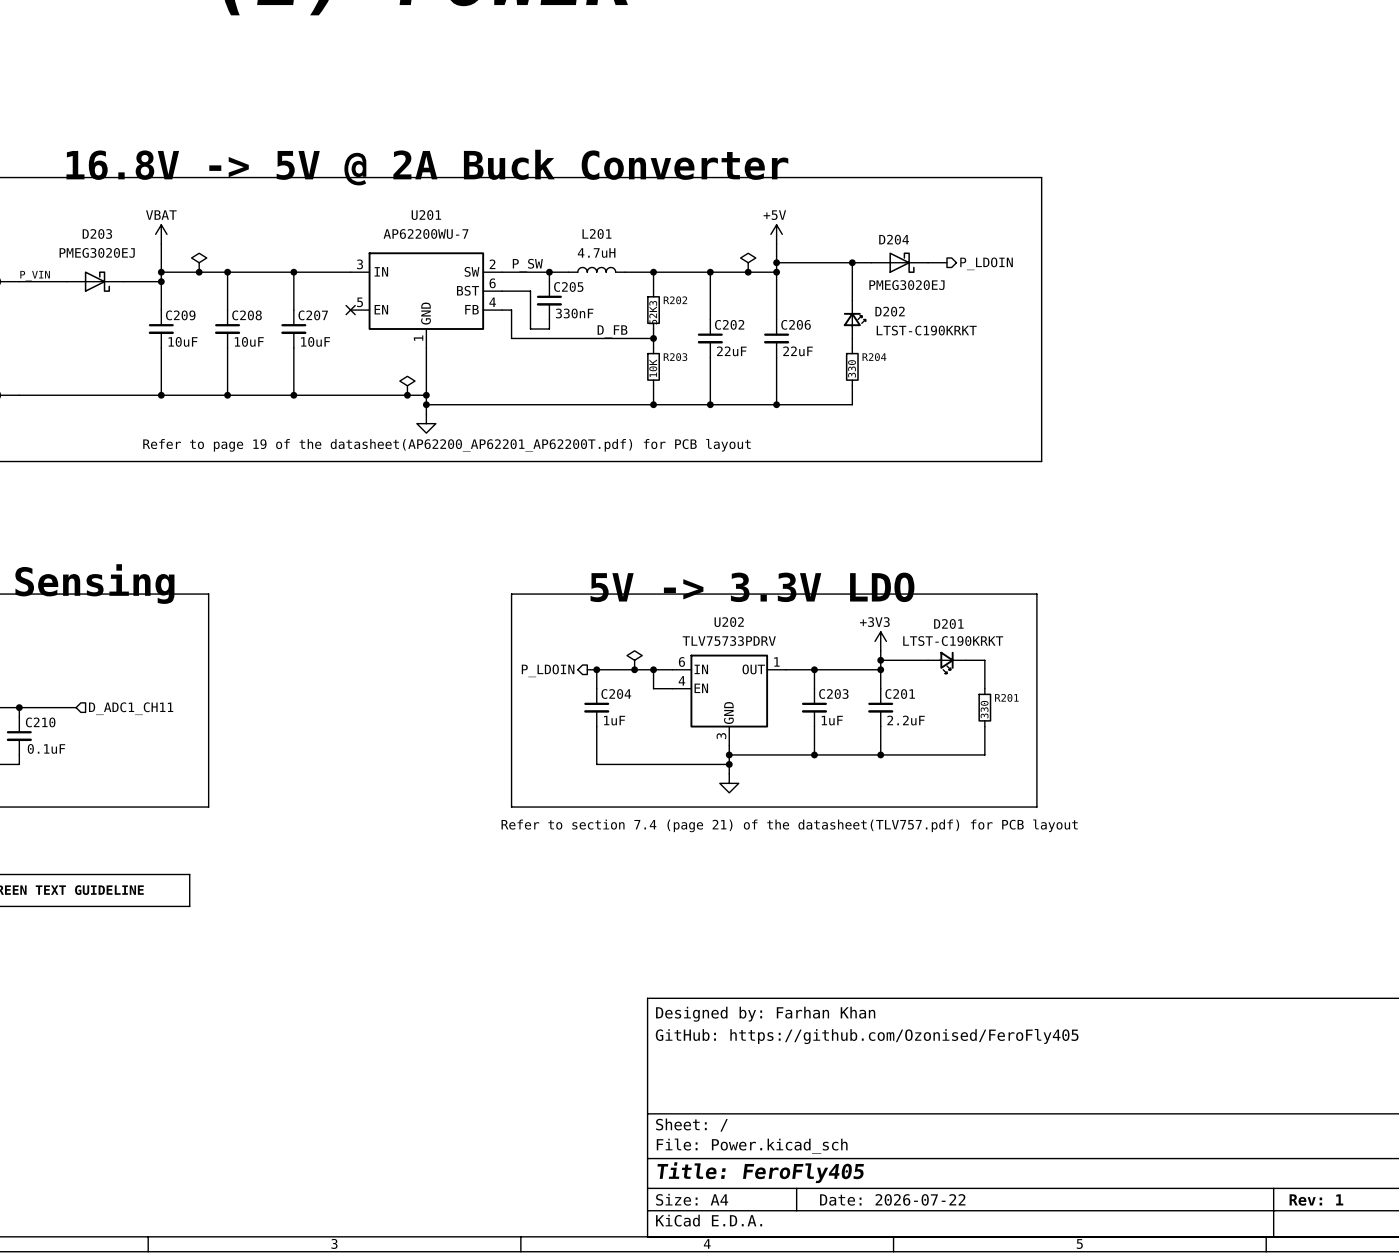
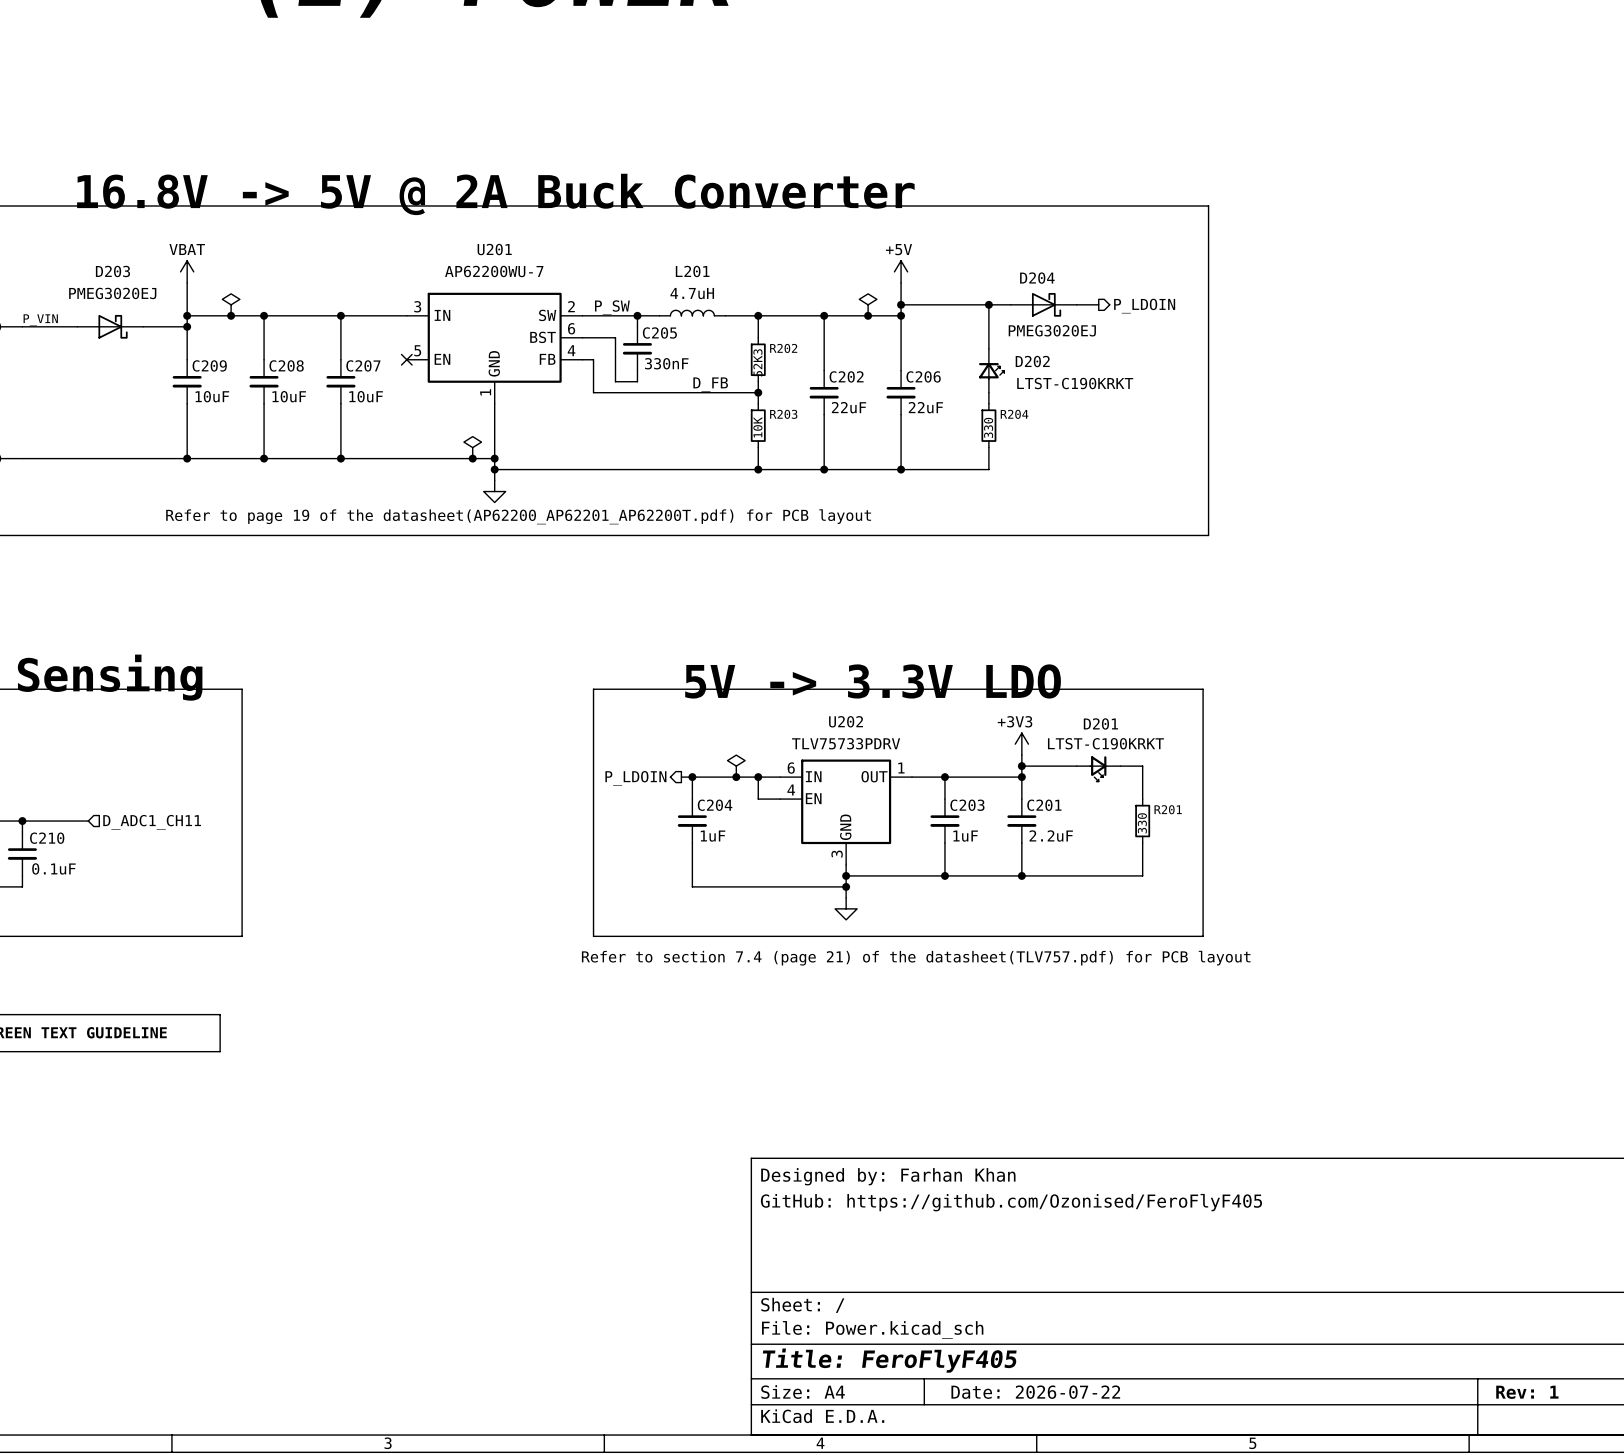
title block: GitHub: https://github.com/Ozonised/FeroFly405 (867, 1036) -> GitHub: https://github.com/Ozonised/FeroFlyF405 (1011, 1202)
title block: Title: FeroFly405 (760, 1172) -> Title: FeroFlyF405 (889, 1360)

